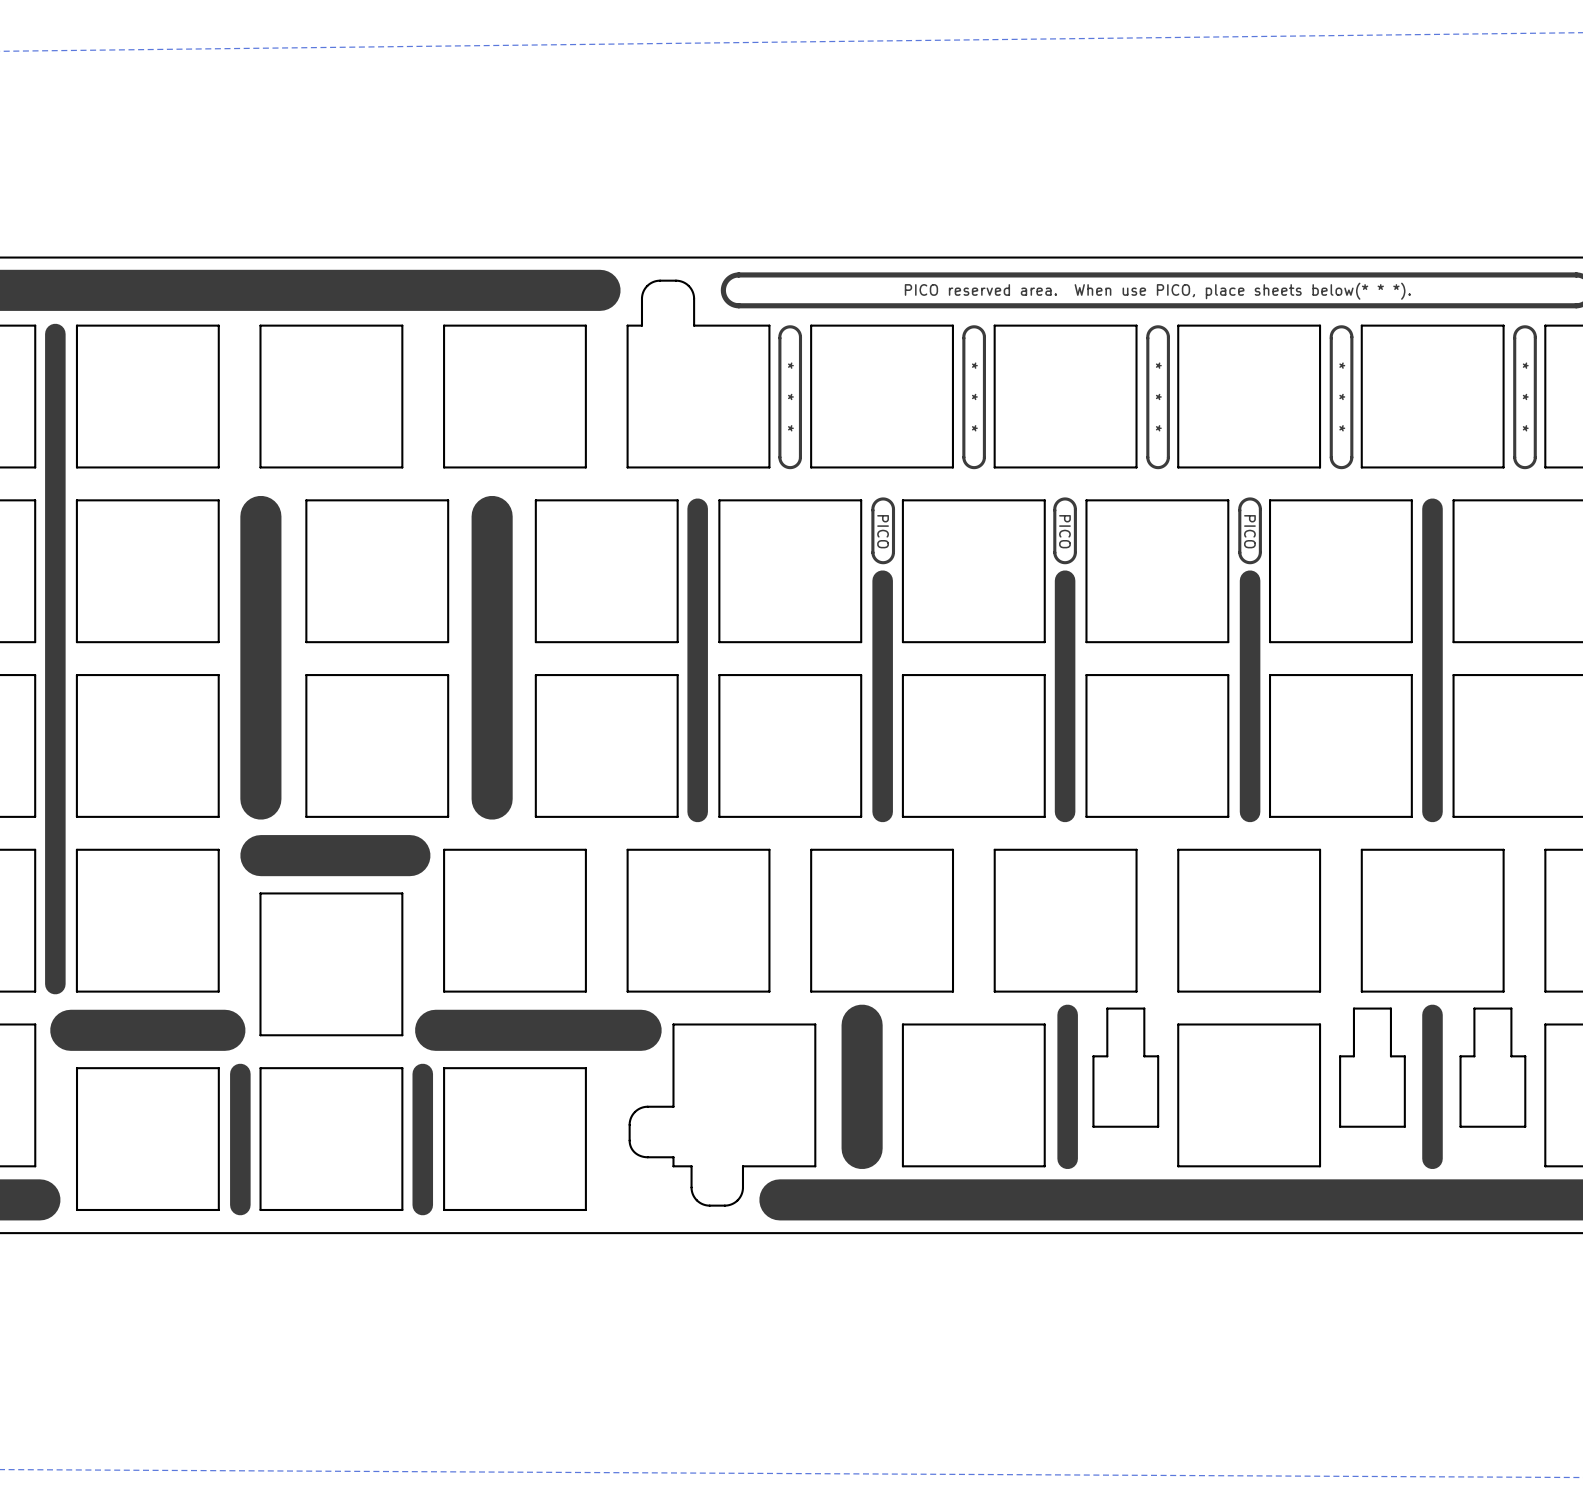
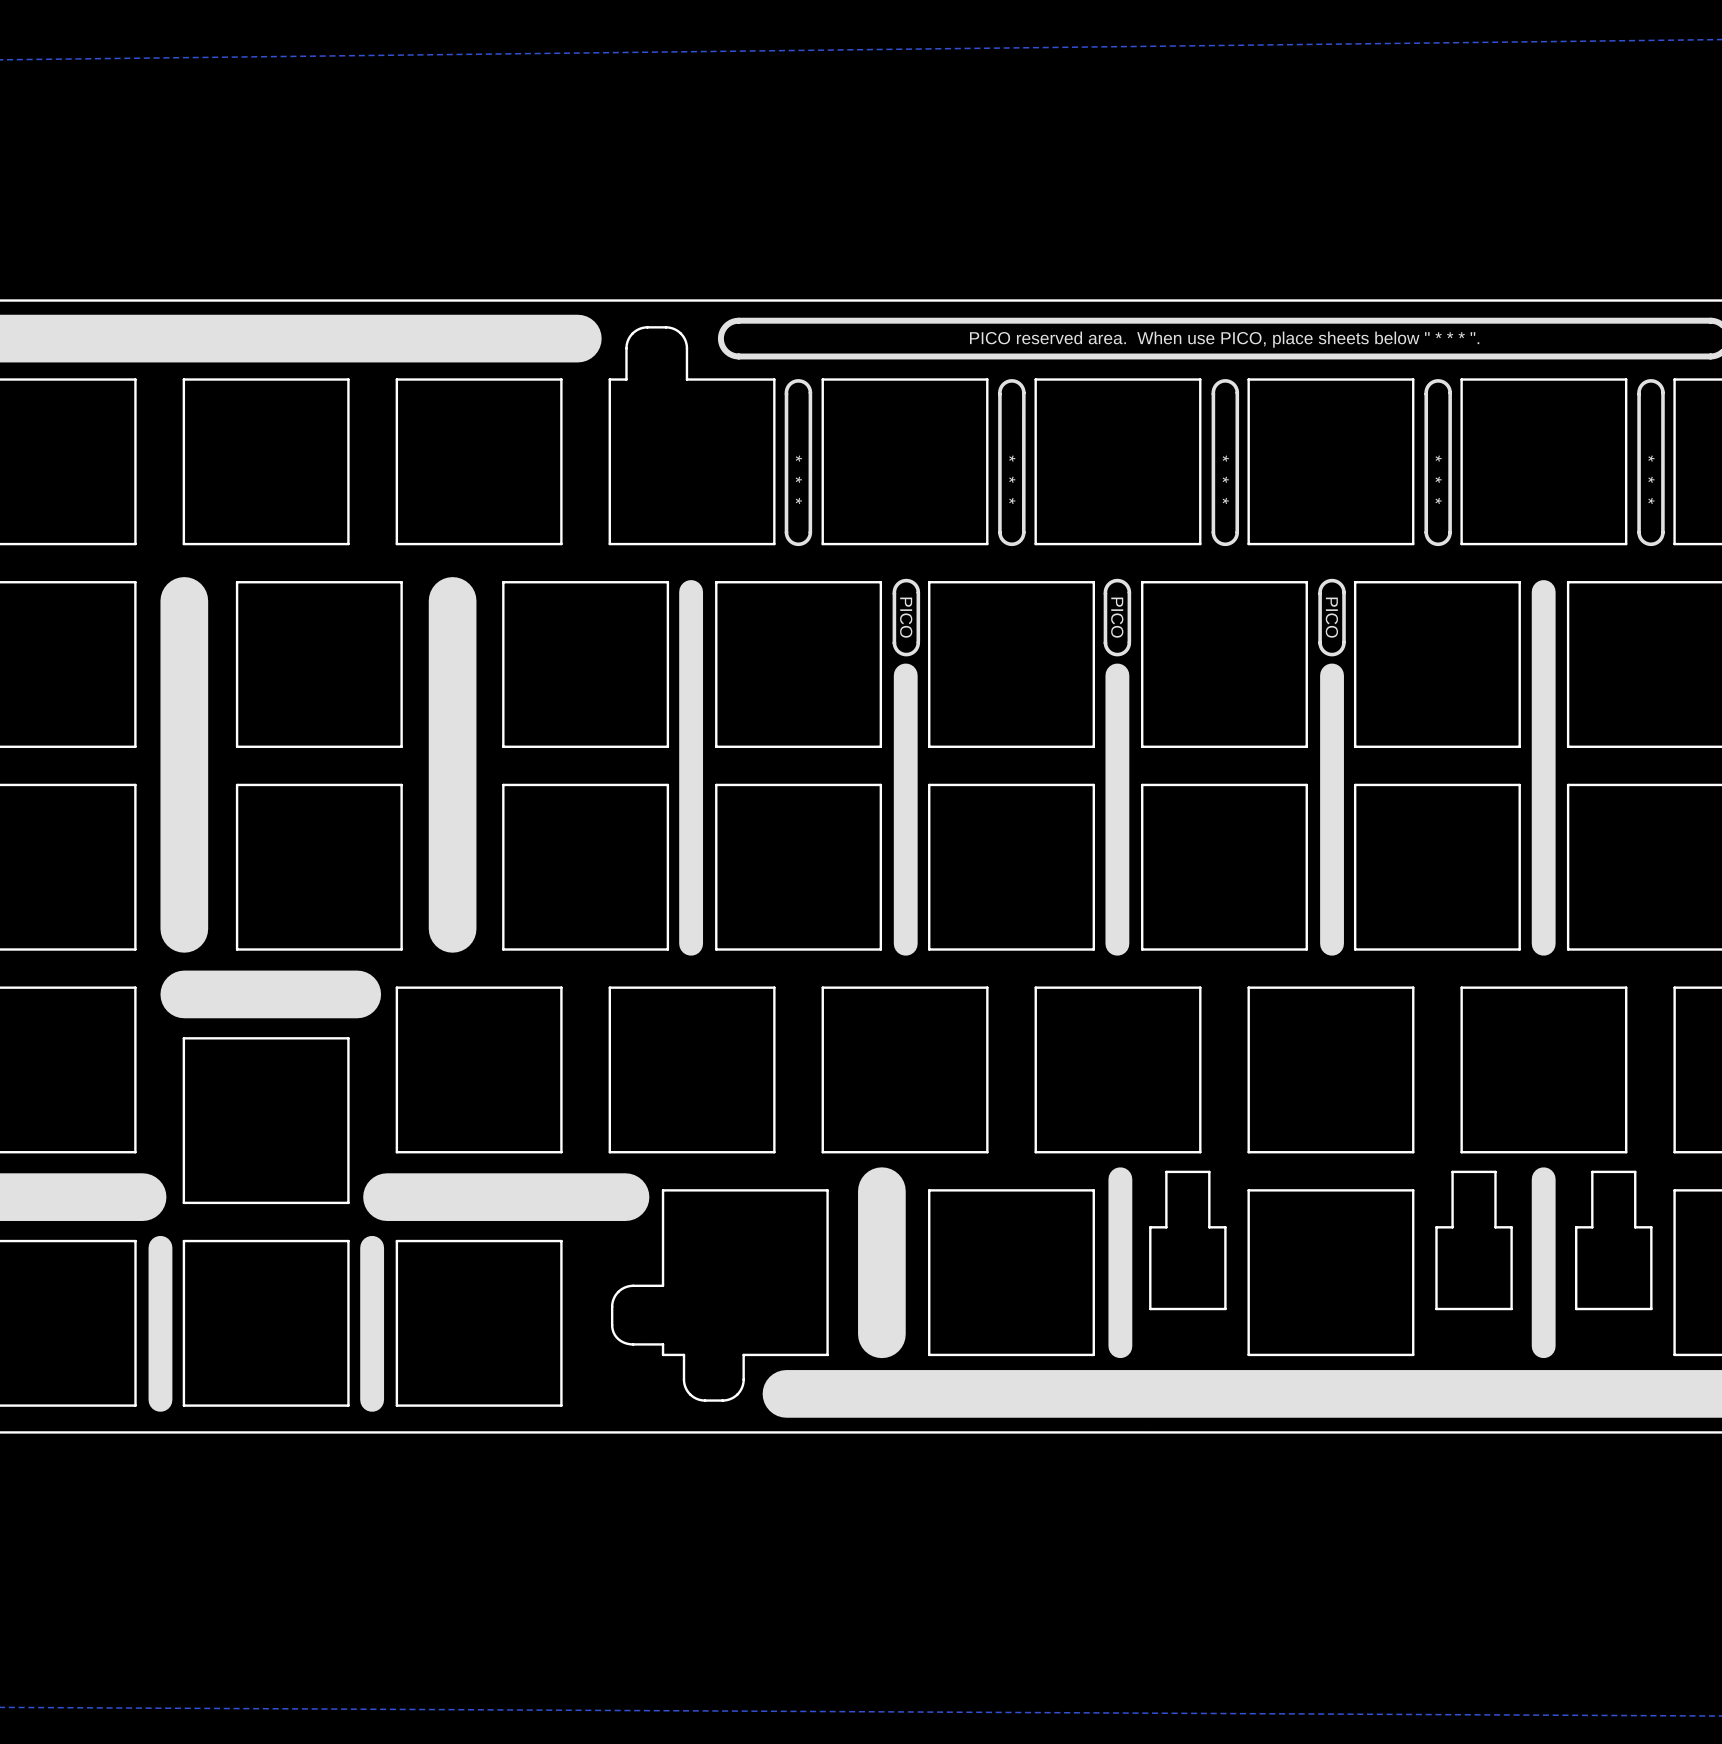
text: PICO reserved area. When use PICO, place sheets below(* * *). (1157, 291) -> PICO reserved area. When use PICO, place sheets below " * * * ". (1224, 339)

